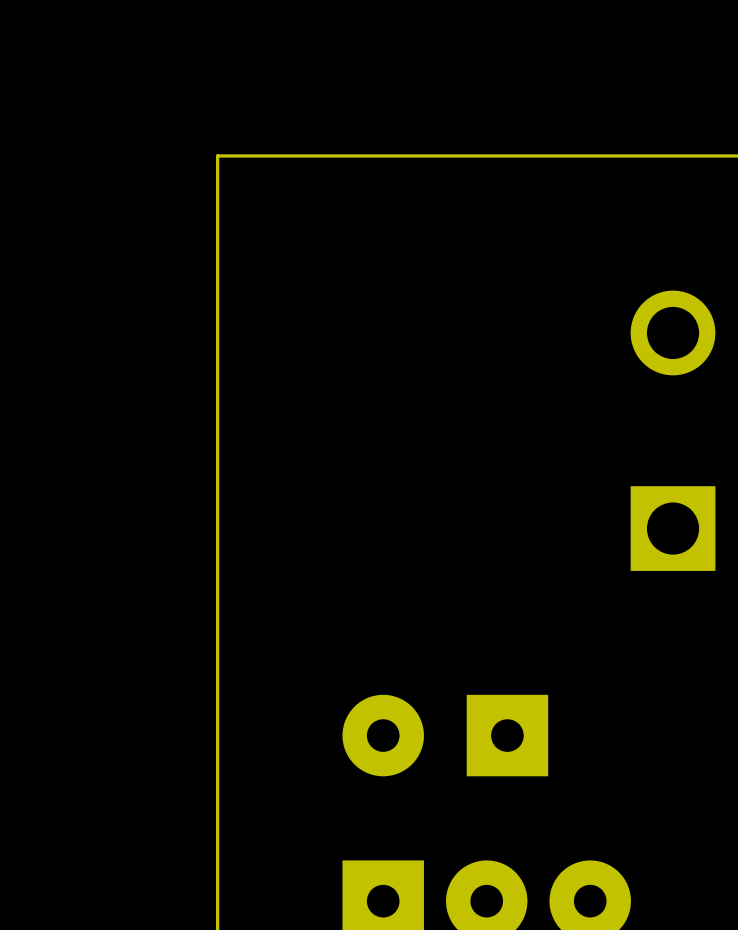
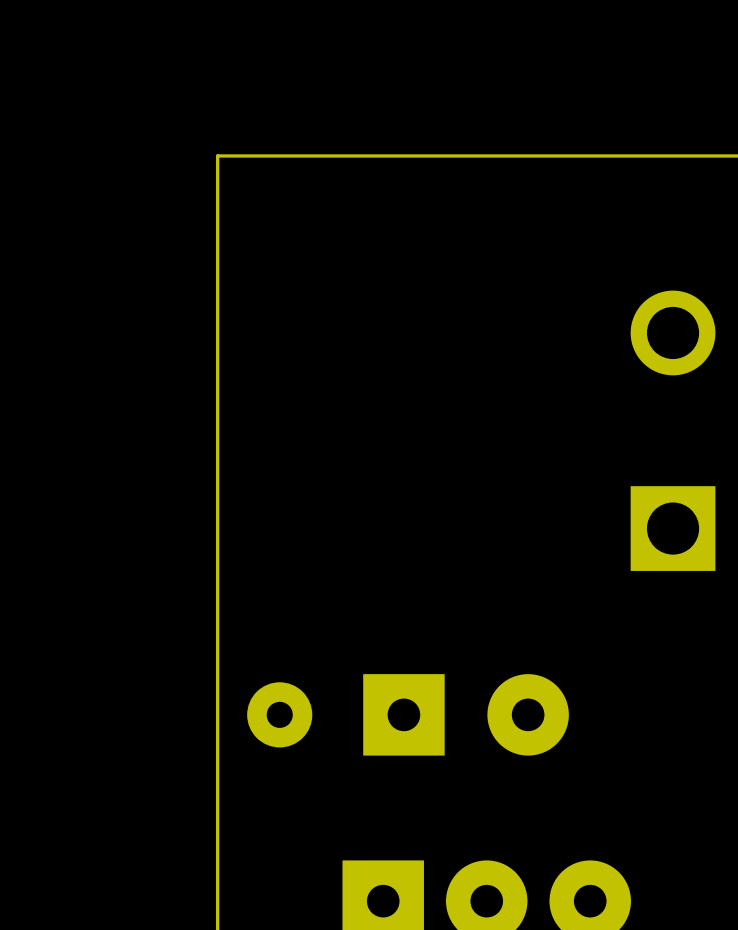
part: none -> (279, 714)
part rotation: 0° (445, 735) -> 180° (466, 714)

